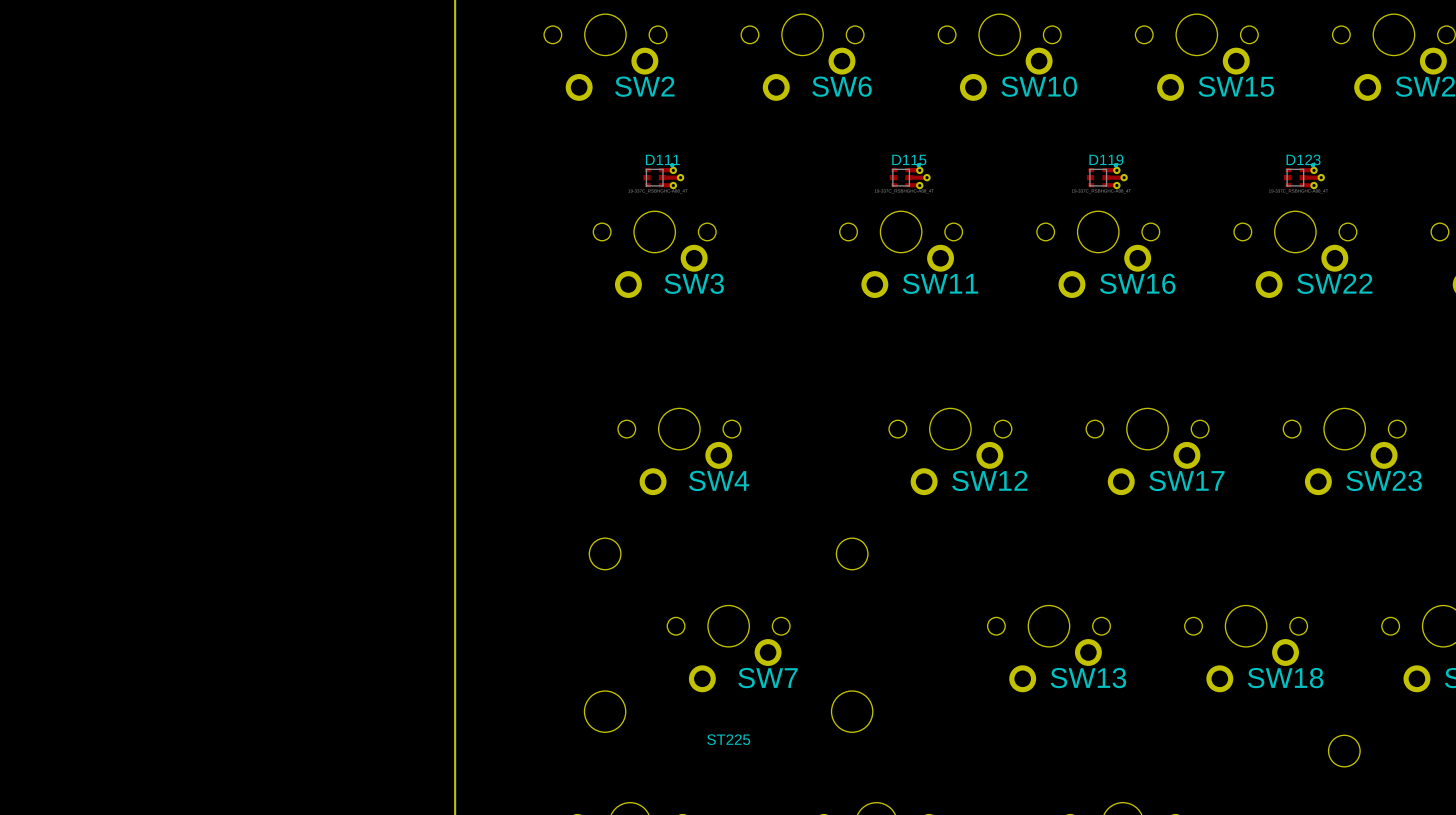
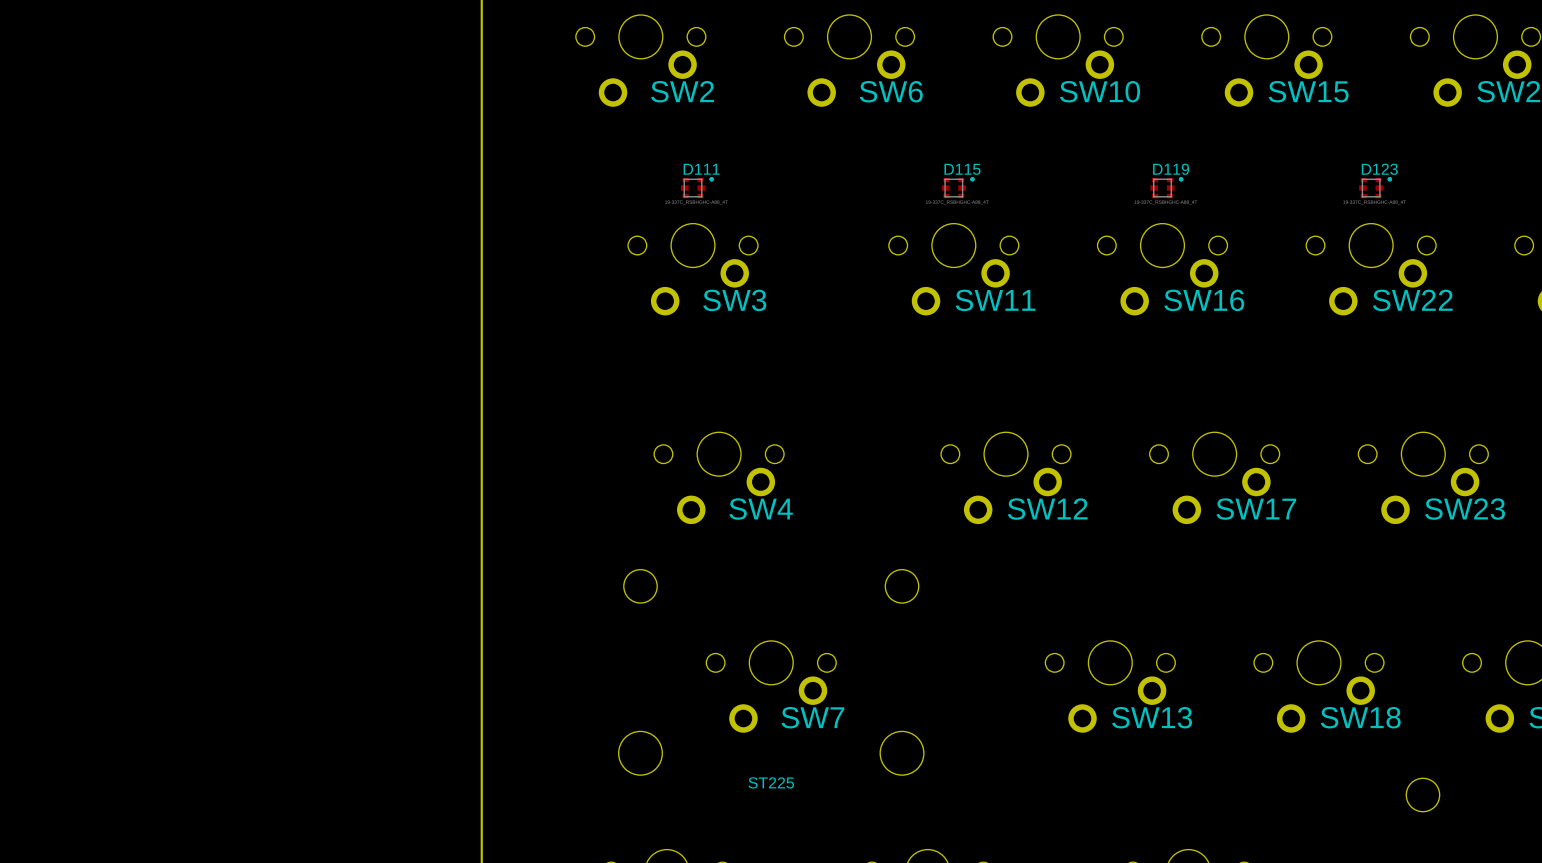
D111 footprint: [643, 163, 685, 190] -> [680, 177, 714, 199]
D115 footprint: [889, 163, 931, 190] -> [941, 177, 975, 199]
D119 footprint: [1086, 163, 1128, 190] -> [1150, 177, 1184, 199]
D123 footprint: [1284, 163, 1325, 190] -> [1359, 177, 1392, 199]

